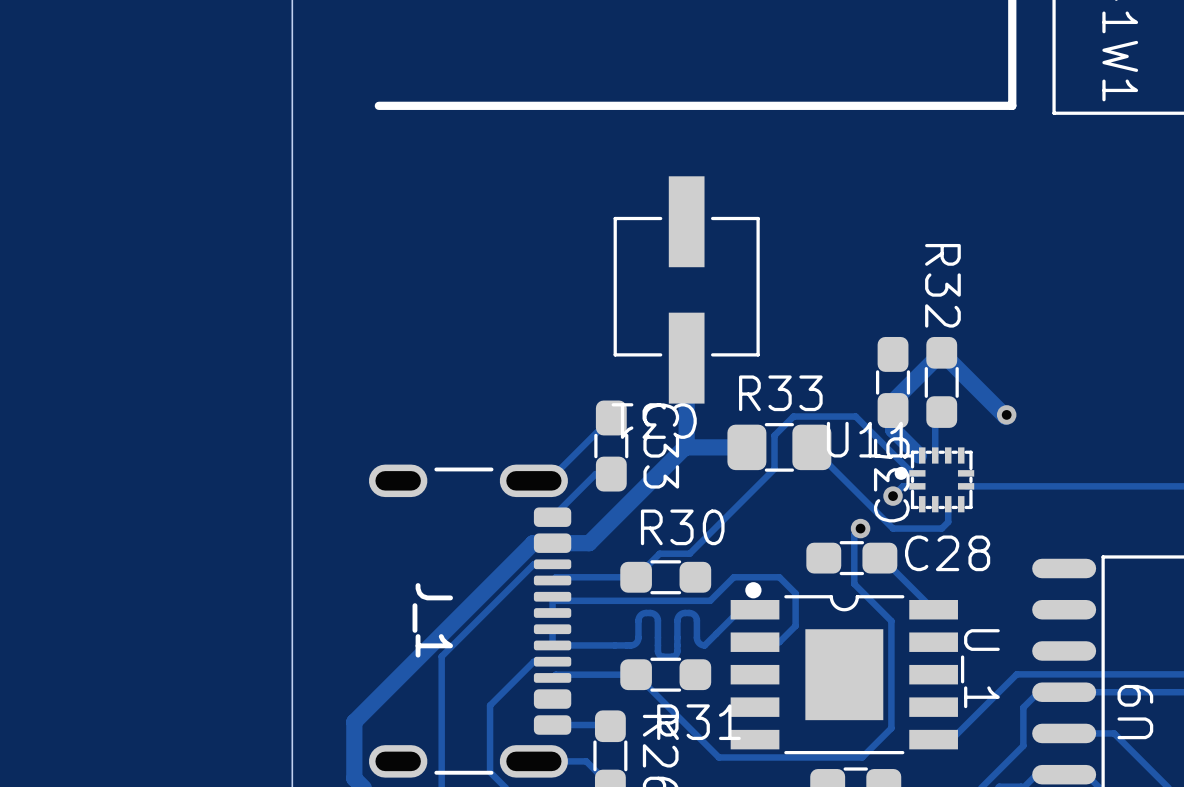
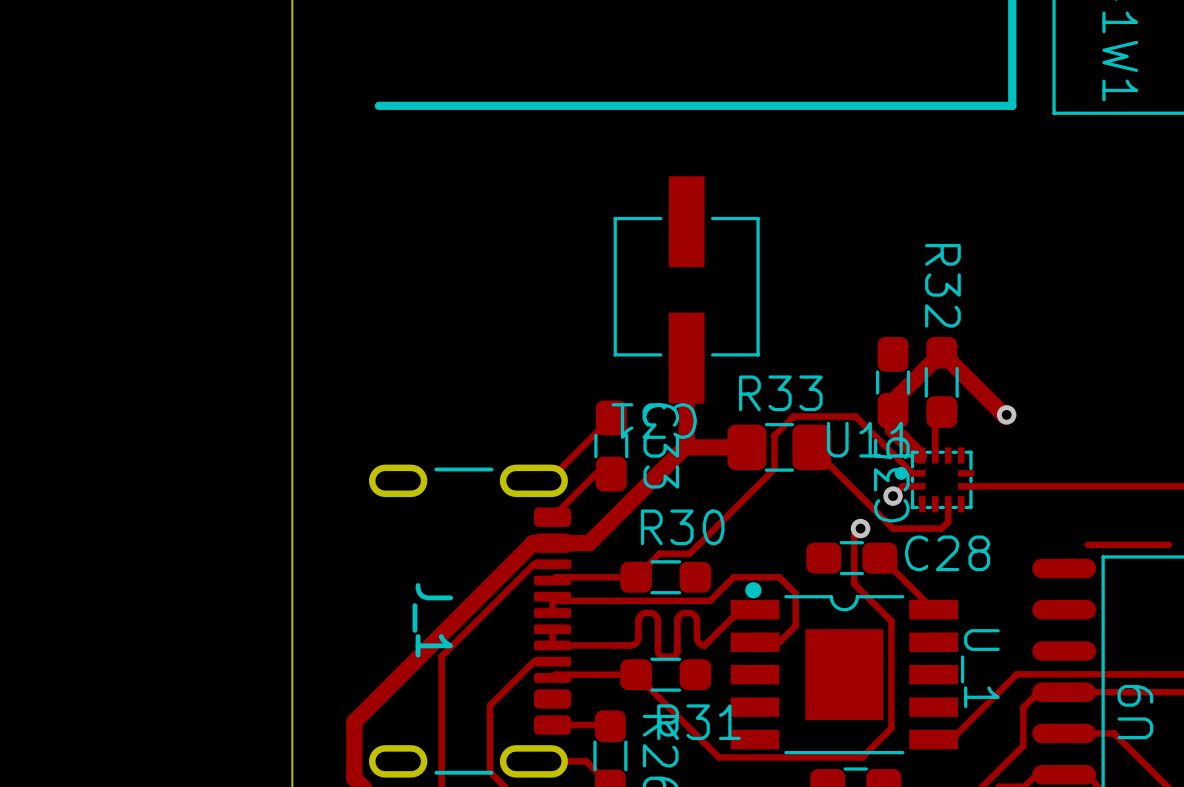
track: none -> (1087, 544) (1169, 544)

